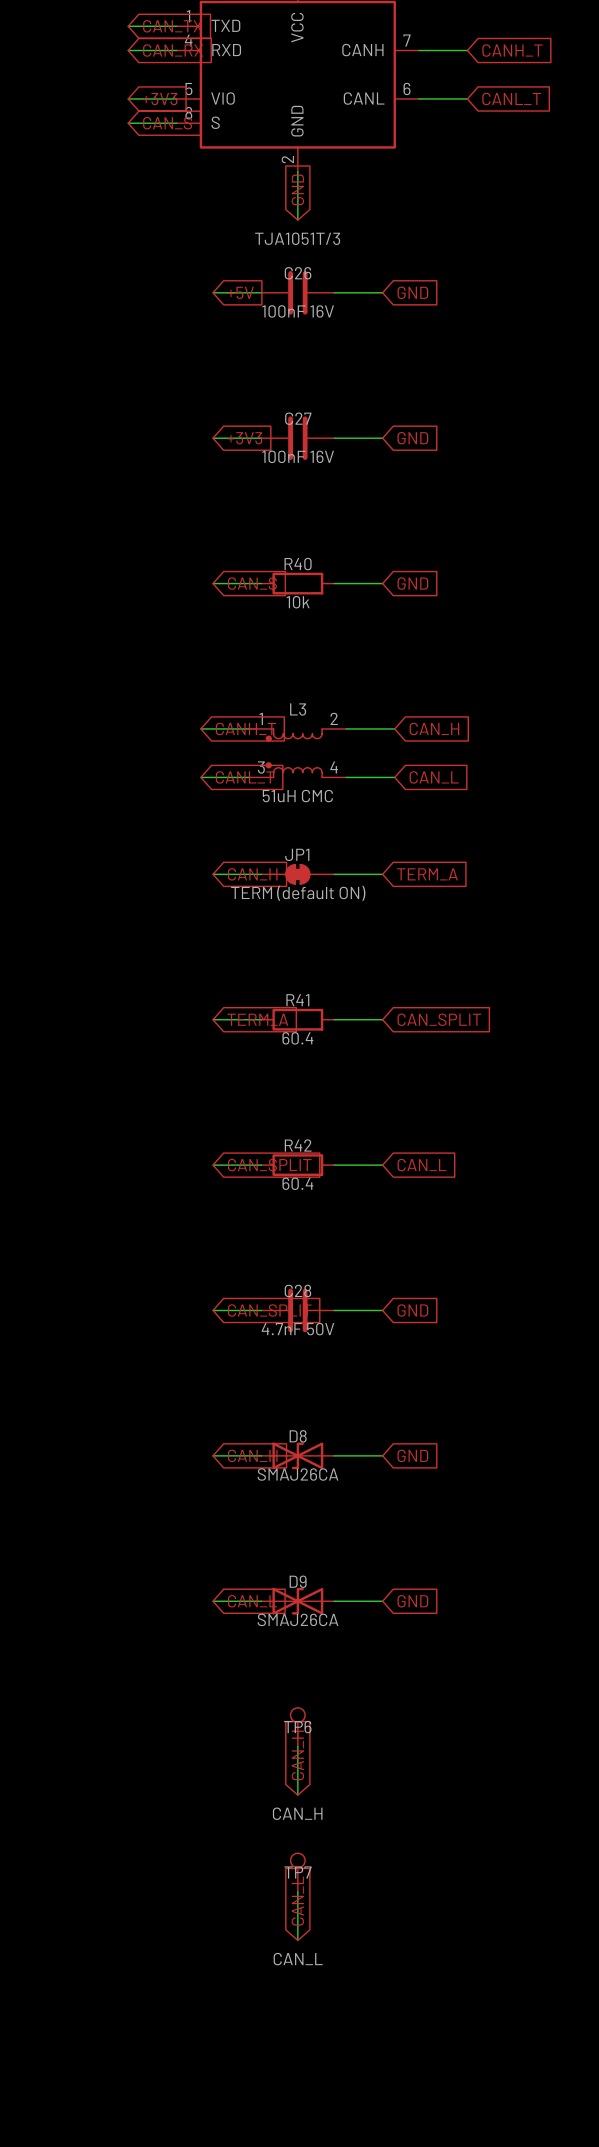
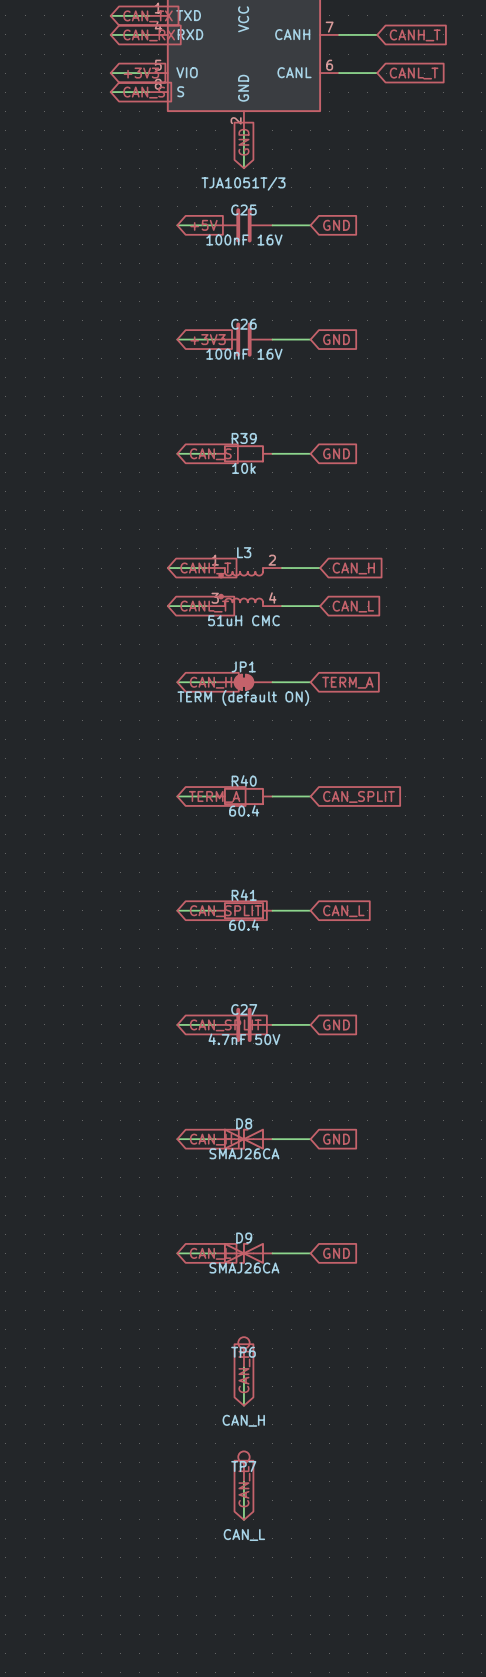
C26 name: C26 (298, 273) -> C25 (243, 210)
C27 name: C27 (298, 418) -> C26 (243, 324)
R40 name: R40 (298, 564) -> R39 (244, 438)
R41 name: R41 (297, 1000) -> R40 (244, 780)
R42 name: R42 (298, 1145) -> R41 (244, 895)
C28 name: C28 (297, 1290) -> C27 (244, 1009)

